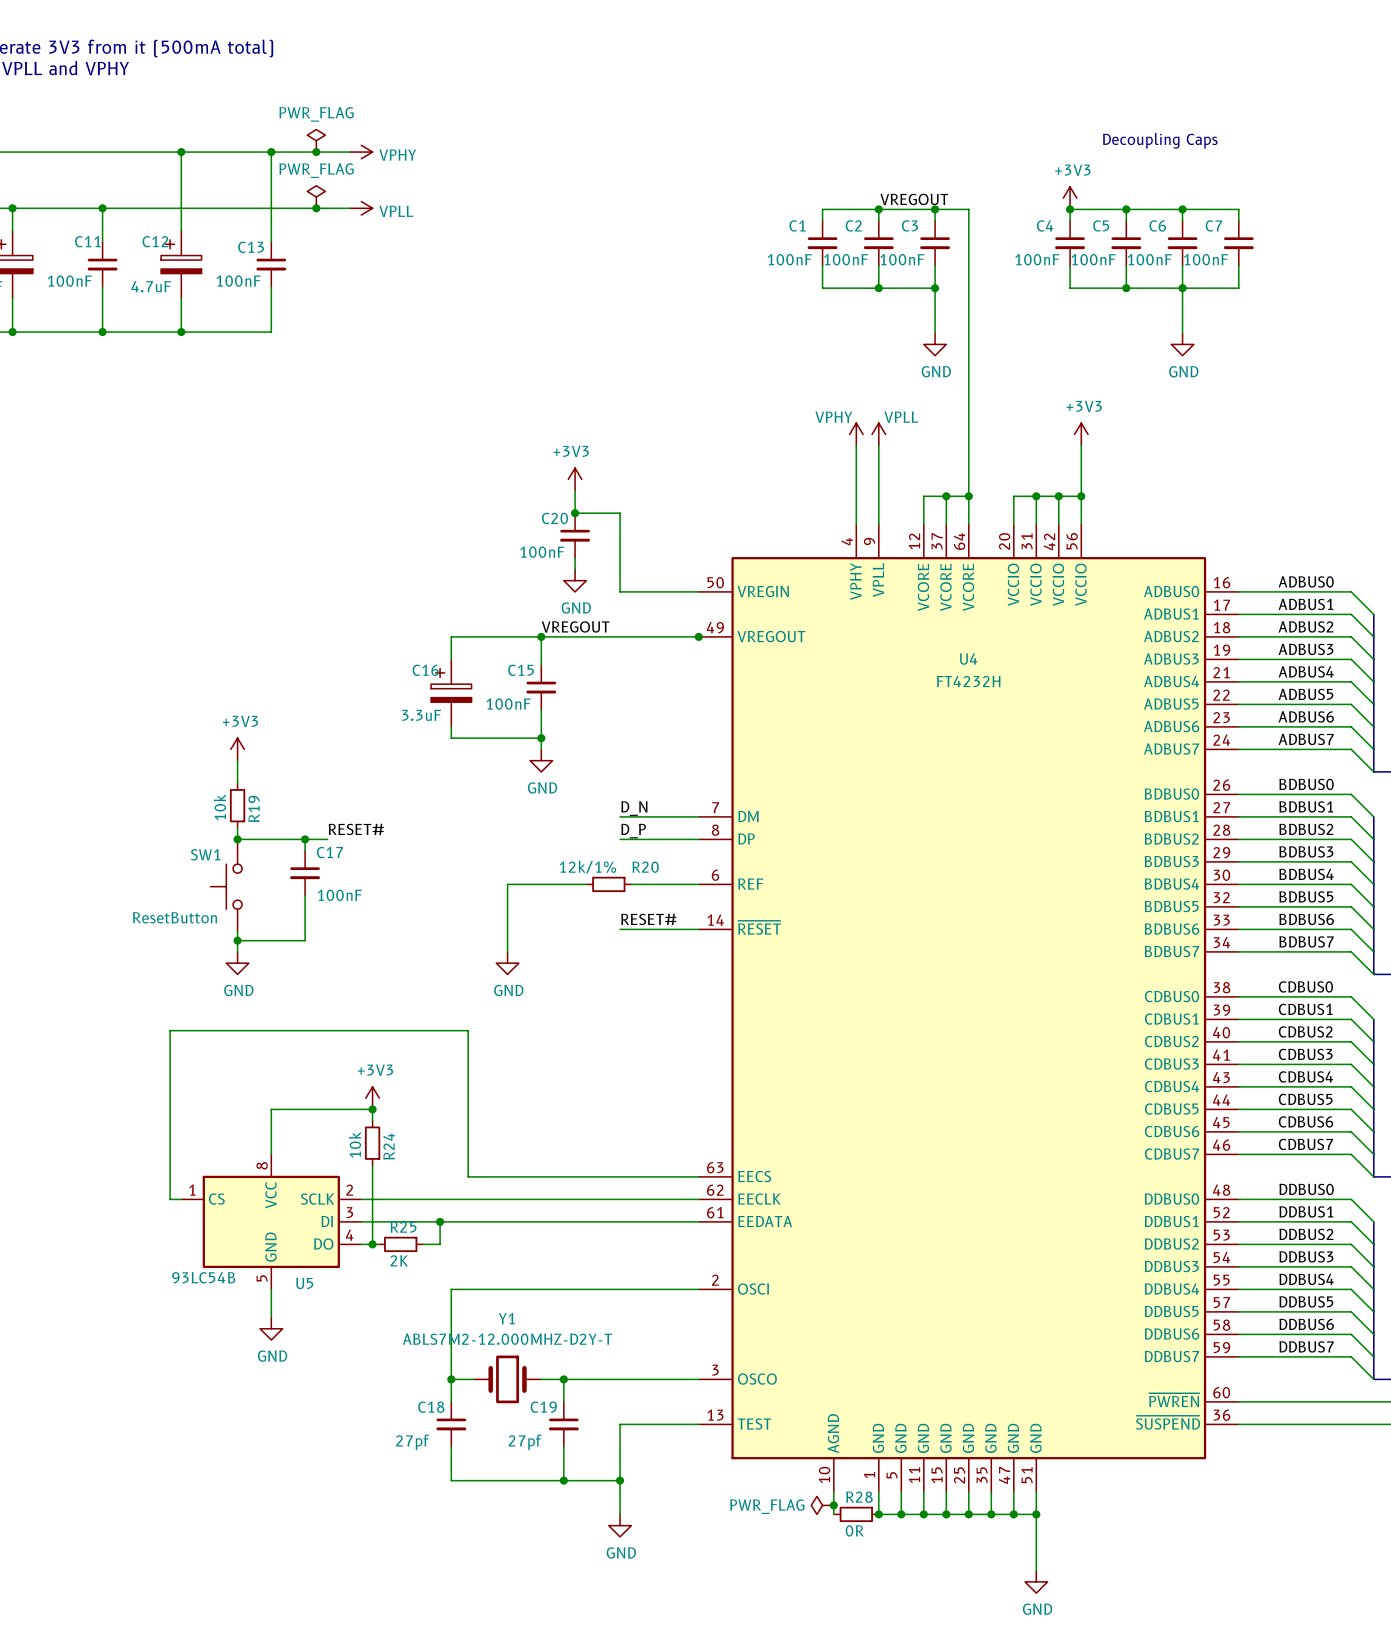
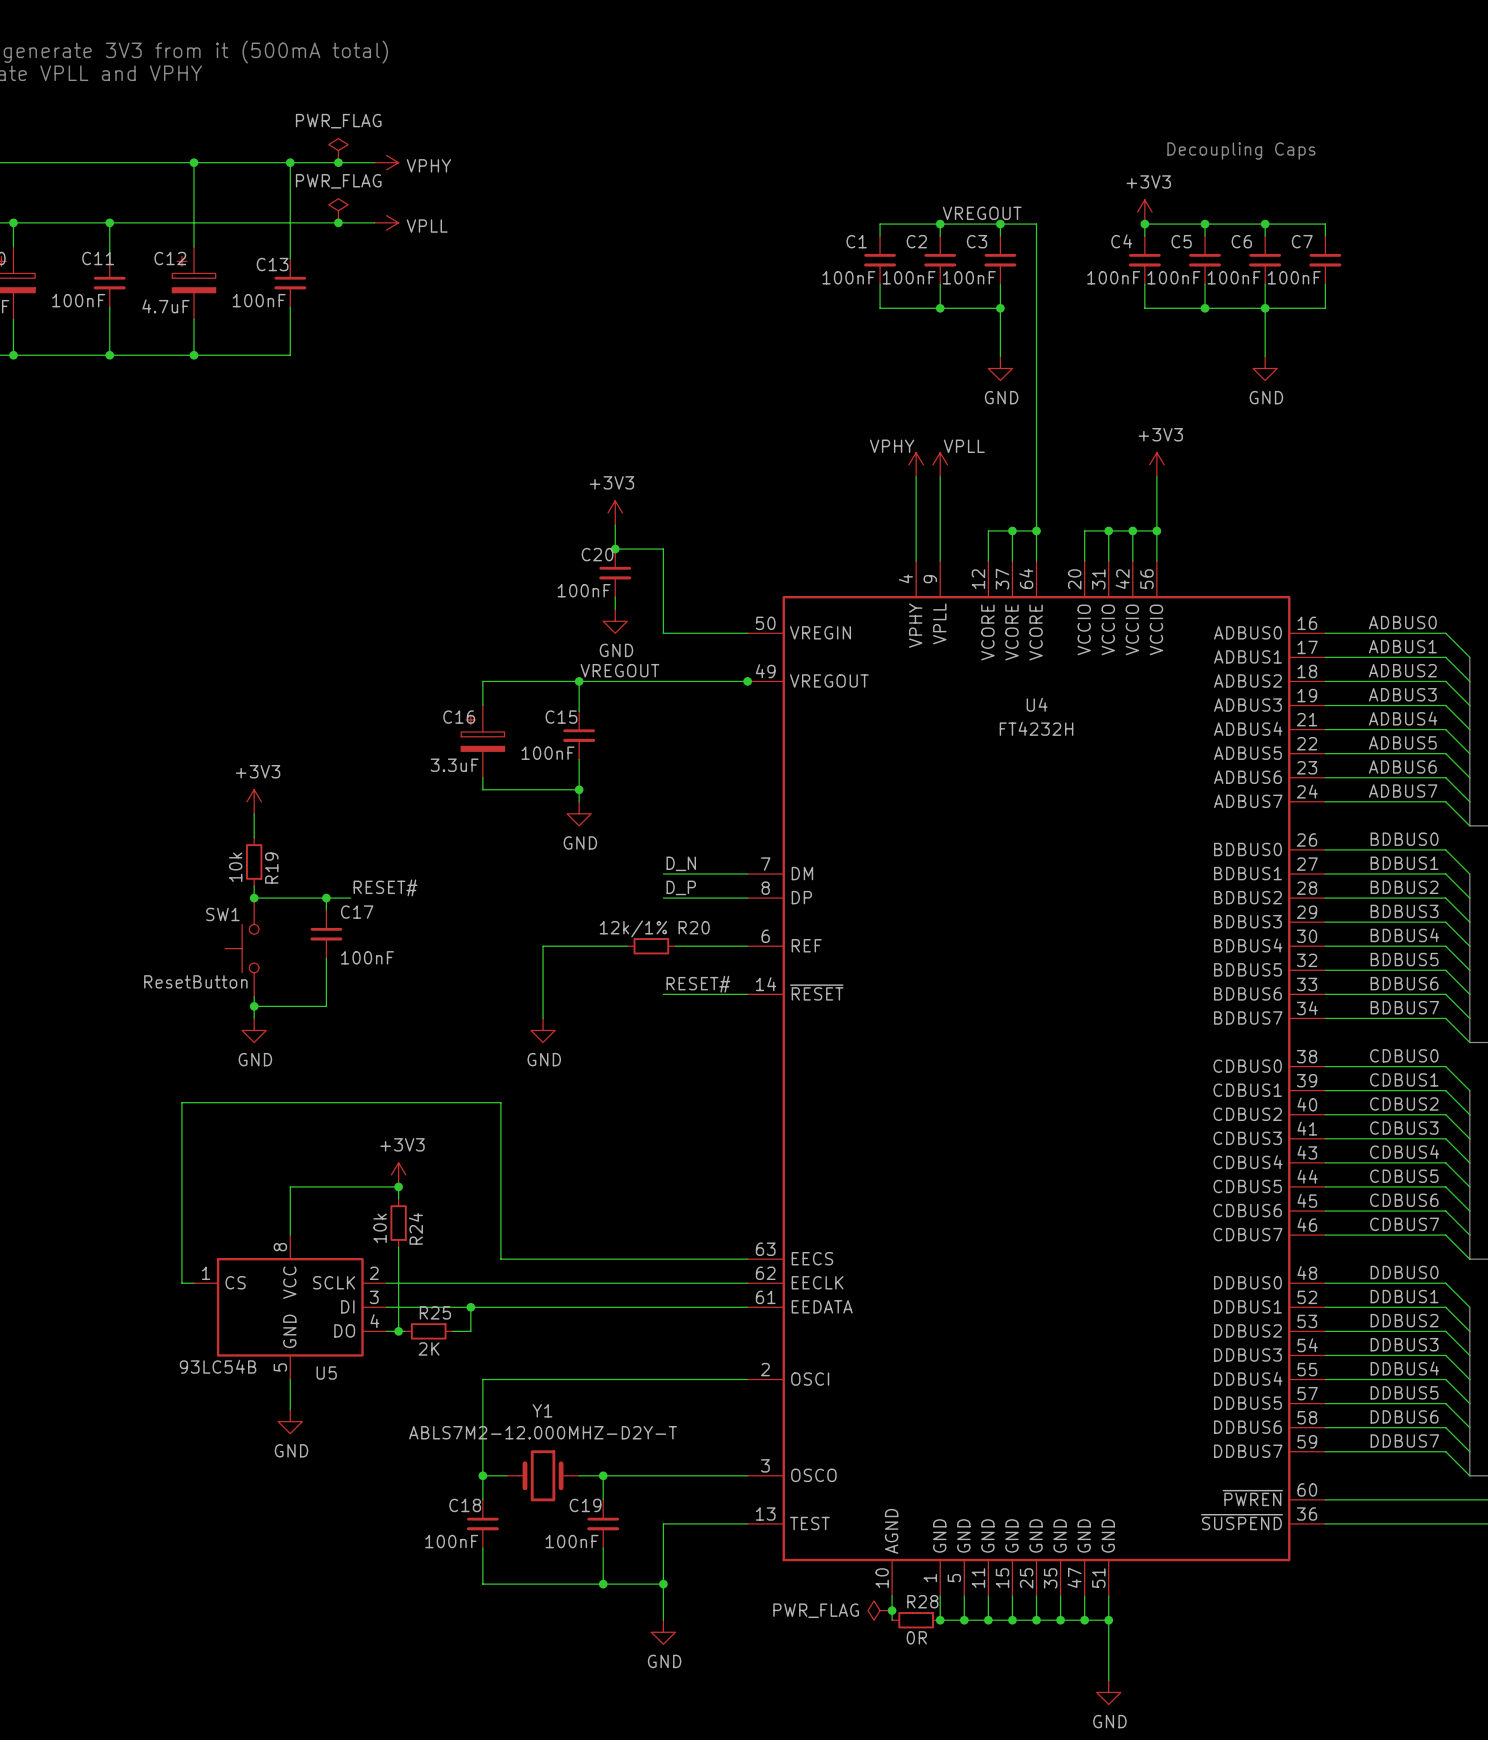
C18 value: 27pf (412, 1442) -> 100nF (451, 1541)
C19 value: 27pf (525, 1442) -> 100nF (572, 1541)

